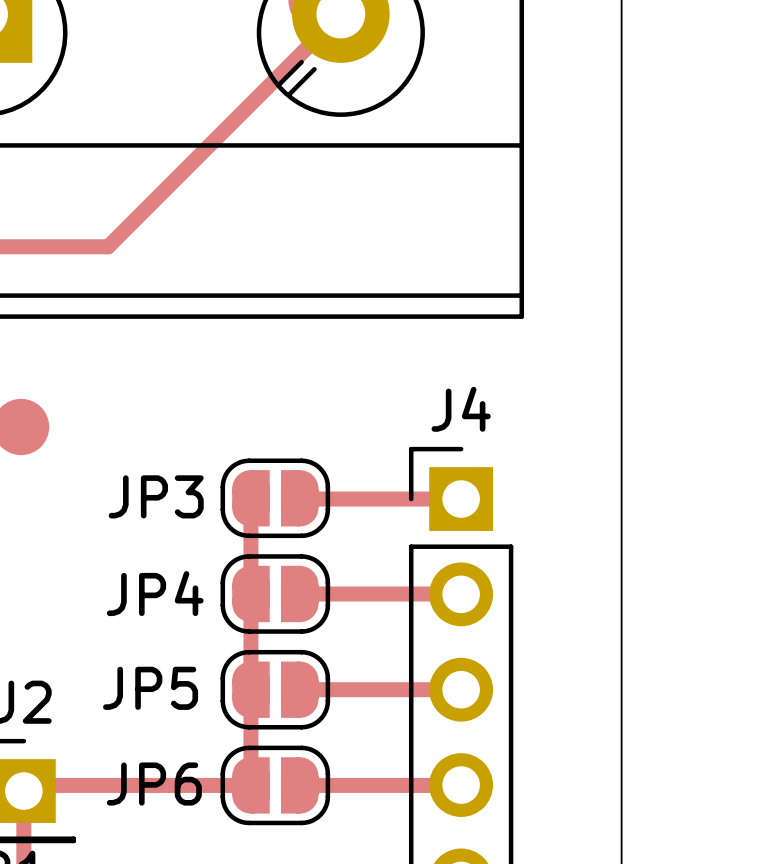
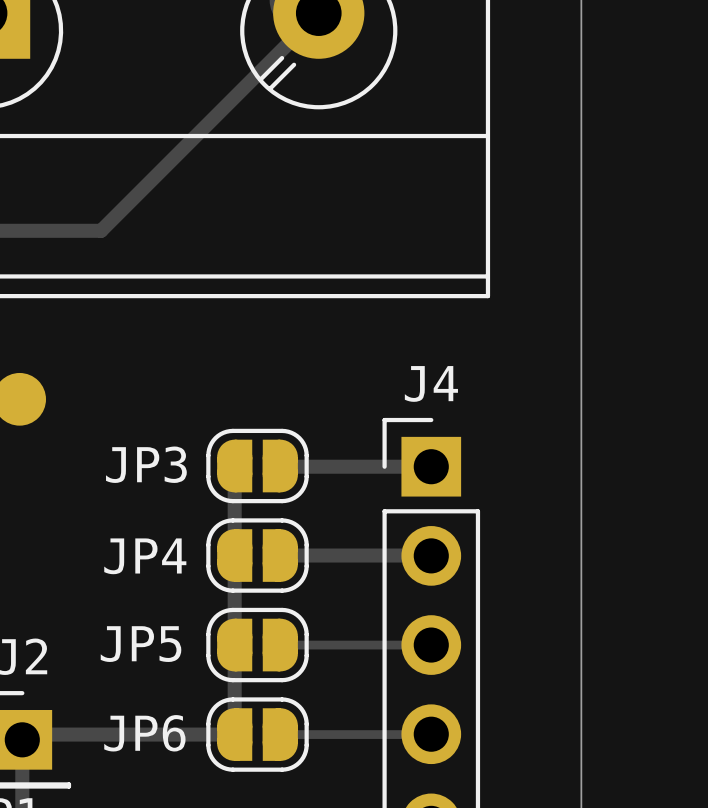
track width: thick (299, 689) (461, 689) -> thin (280, 645) (431, 645)
track width: thick (299, 785) (460, 785) -> thin (280, 734) (430, 734)

